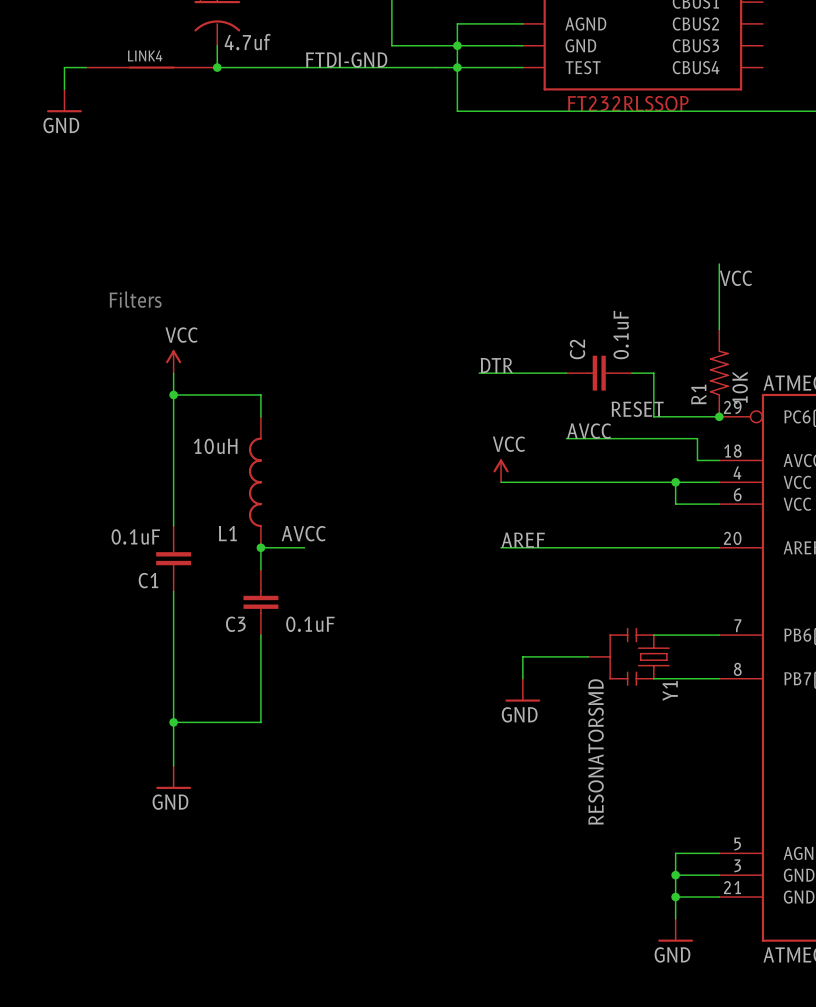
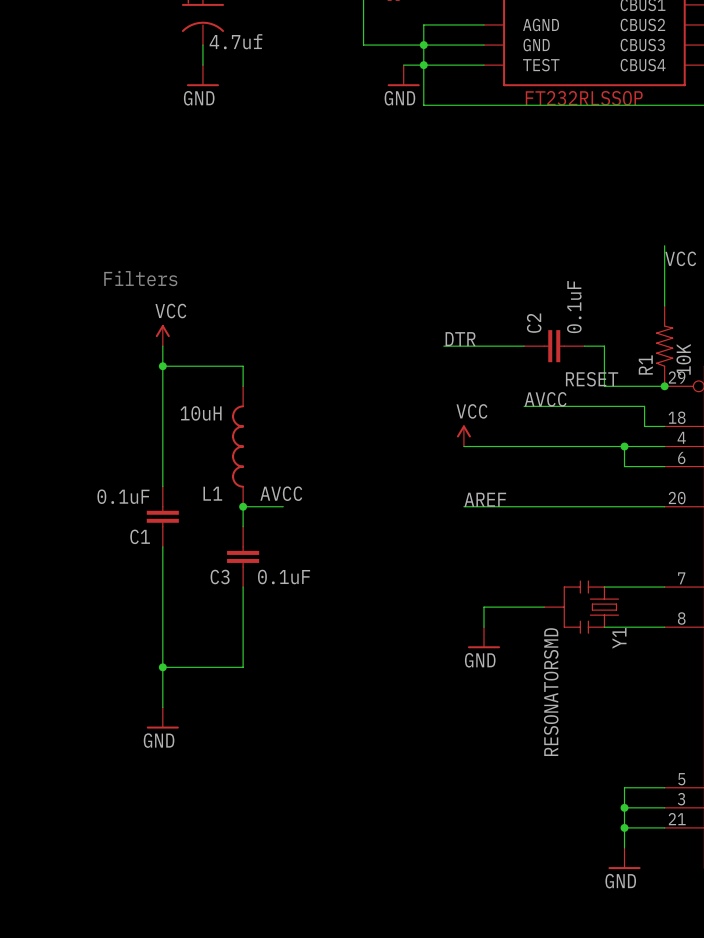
label: FTDI-GND (346, 60) -> none
wire: (86, 67) (64, 67) (64, 89) -> none
LINK4: (151, 67) -> none
wire: (217, 67) (435, 67) -> none
junction: (217, 67) -> none
power symbol: none -> GND (403, 75)
power symbol position: GND (64, 100) -> GND (202, 75)

